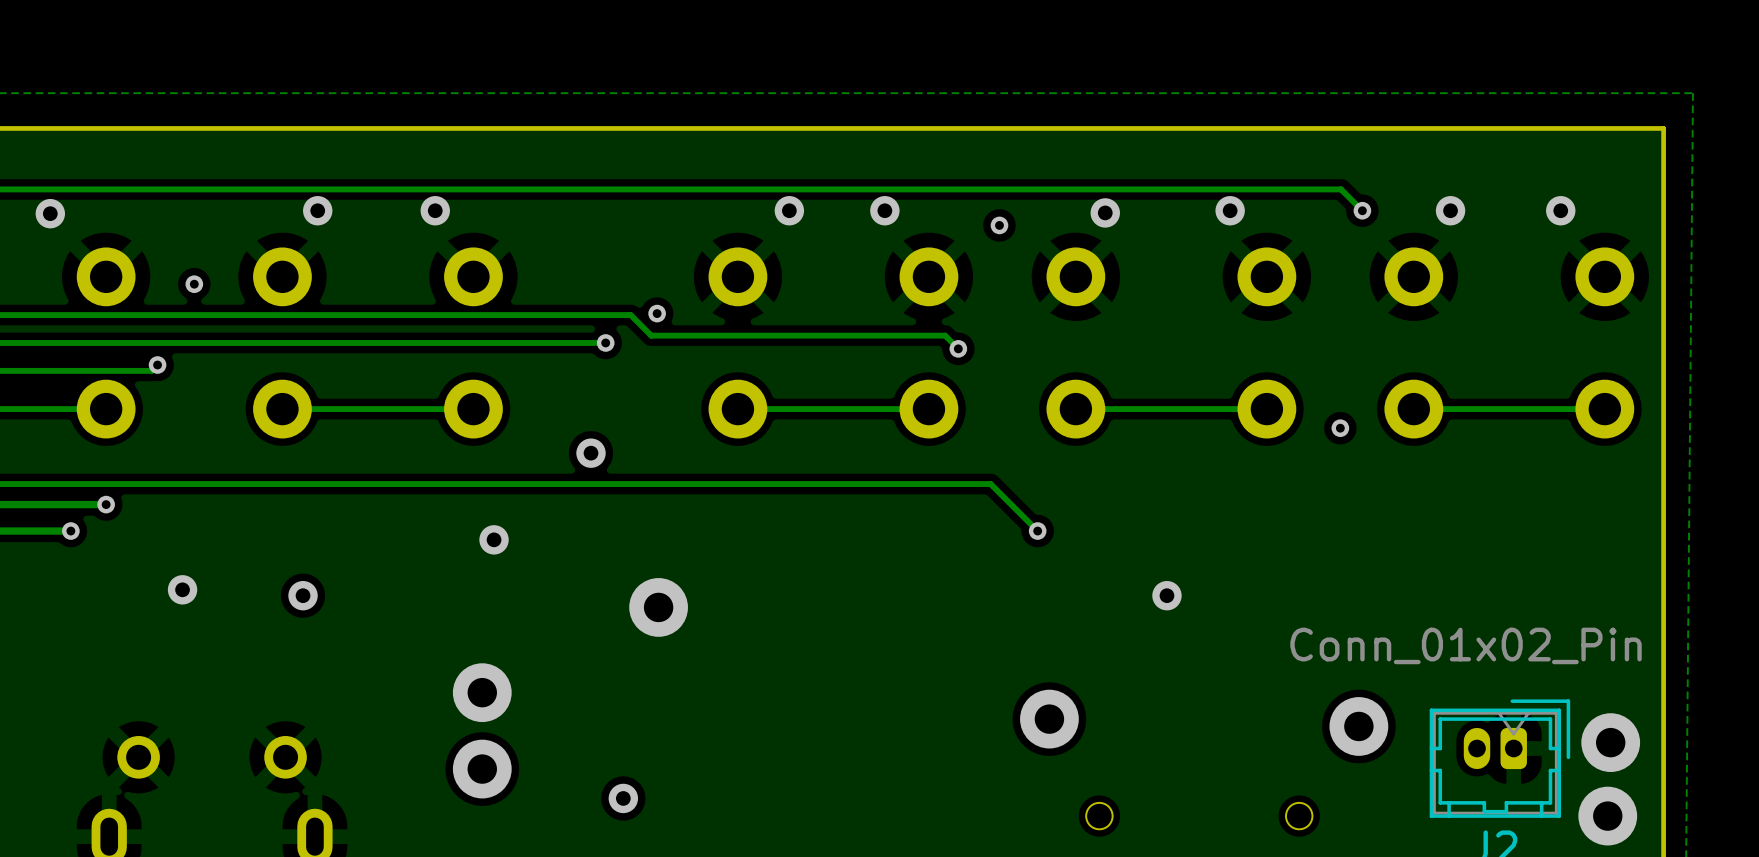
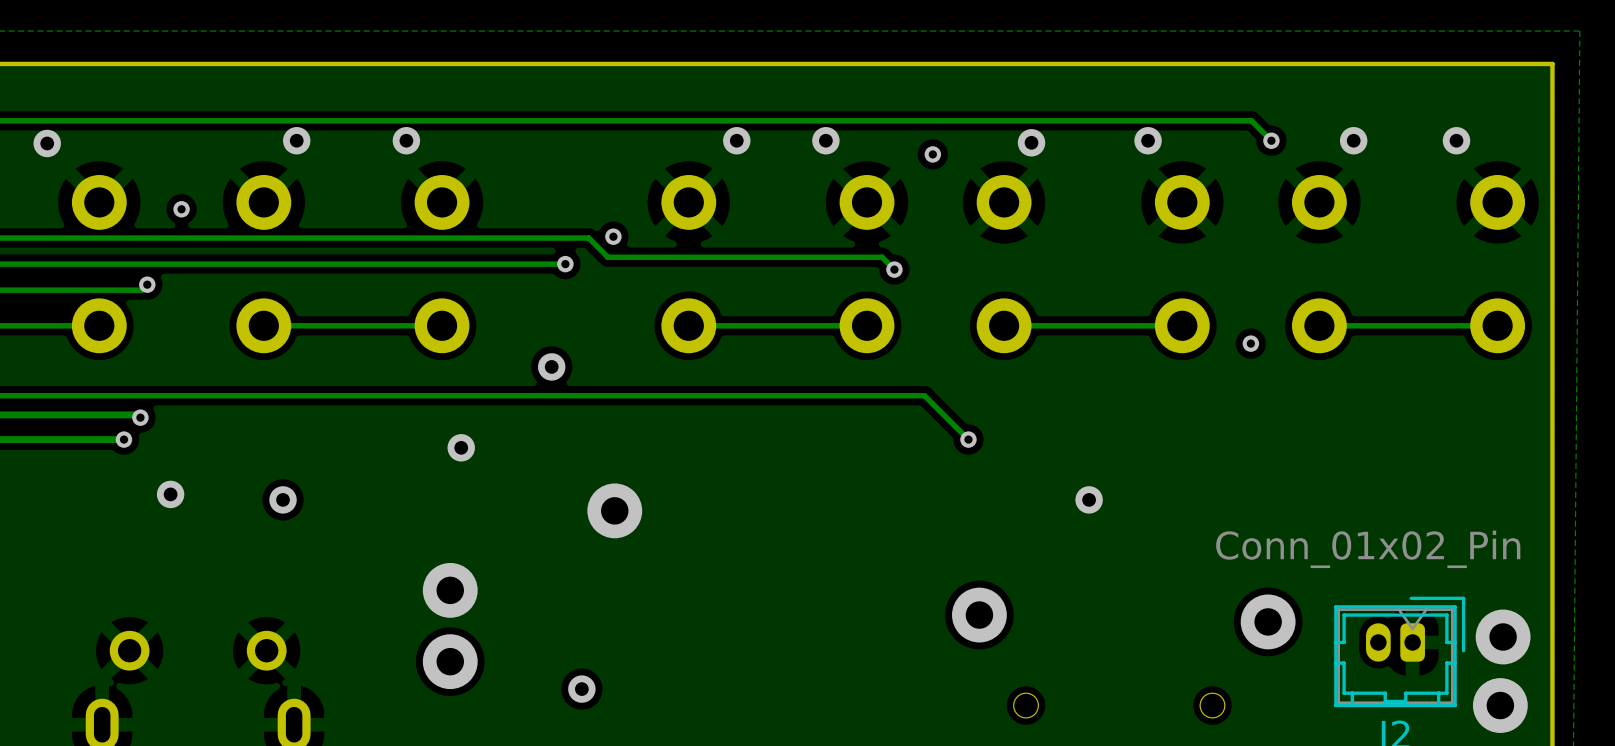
track: none -> (99, 414) (137, 414) (140, 417)
via: (106, 504) -> none
via: none -> (140, 417)
via: (70, 531) -> none
track: none -> (123, 439) (66, 439)
via: none -> (123, 439)

